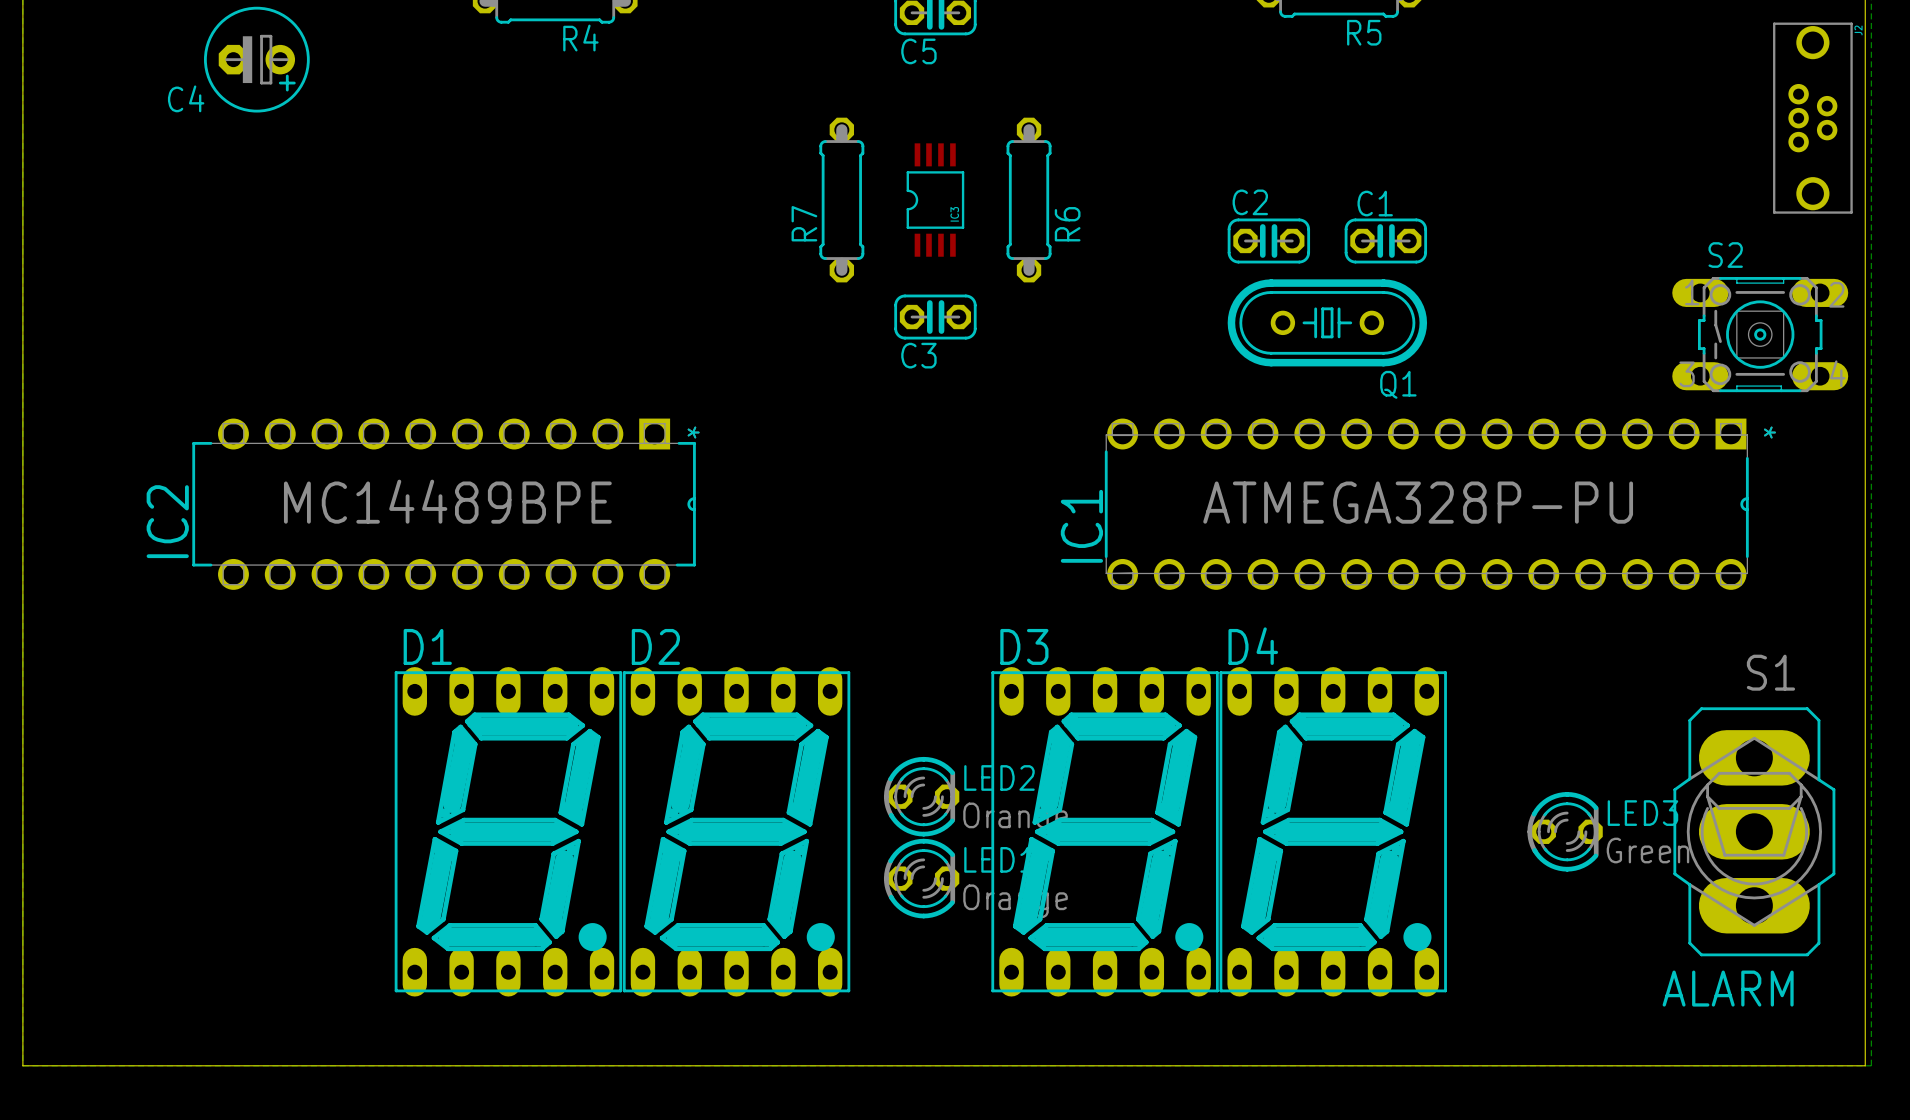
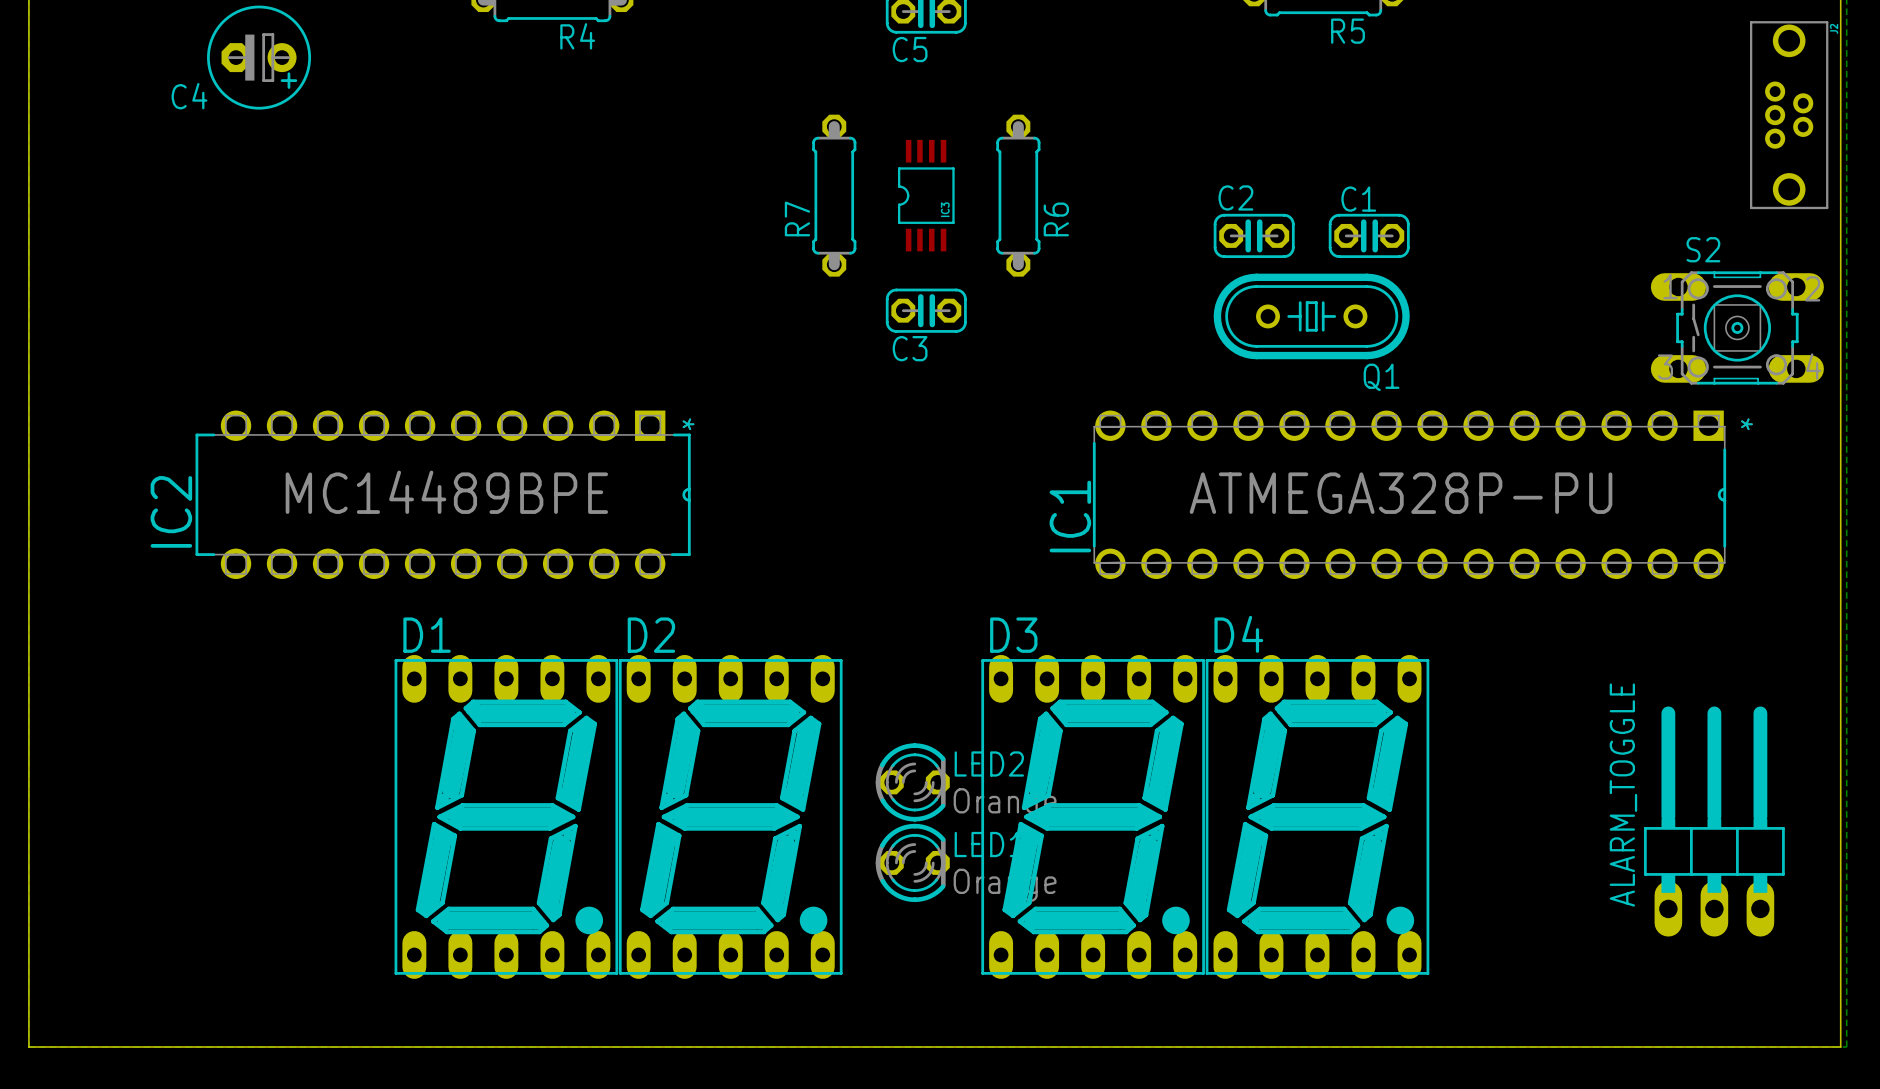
LED3: Green (1565, 831) -> none
ALARM: S1 (1754, 831) -> none
ALARM_TOGGLE: none -> (1714, 821)

